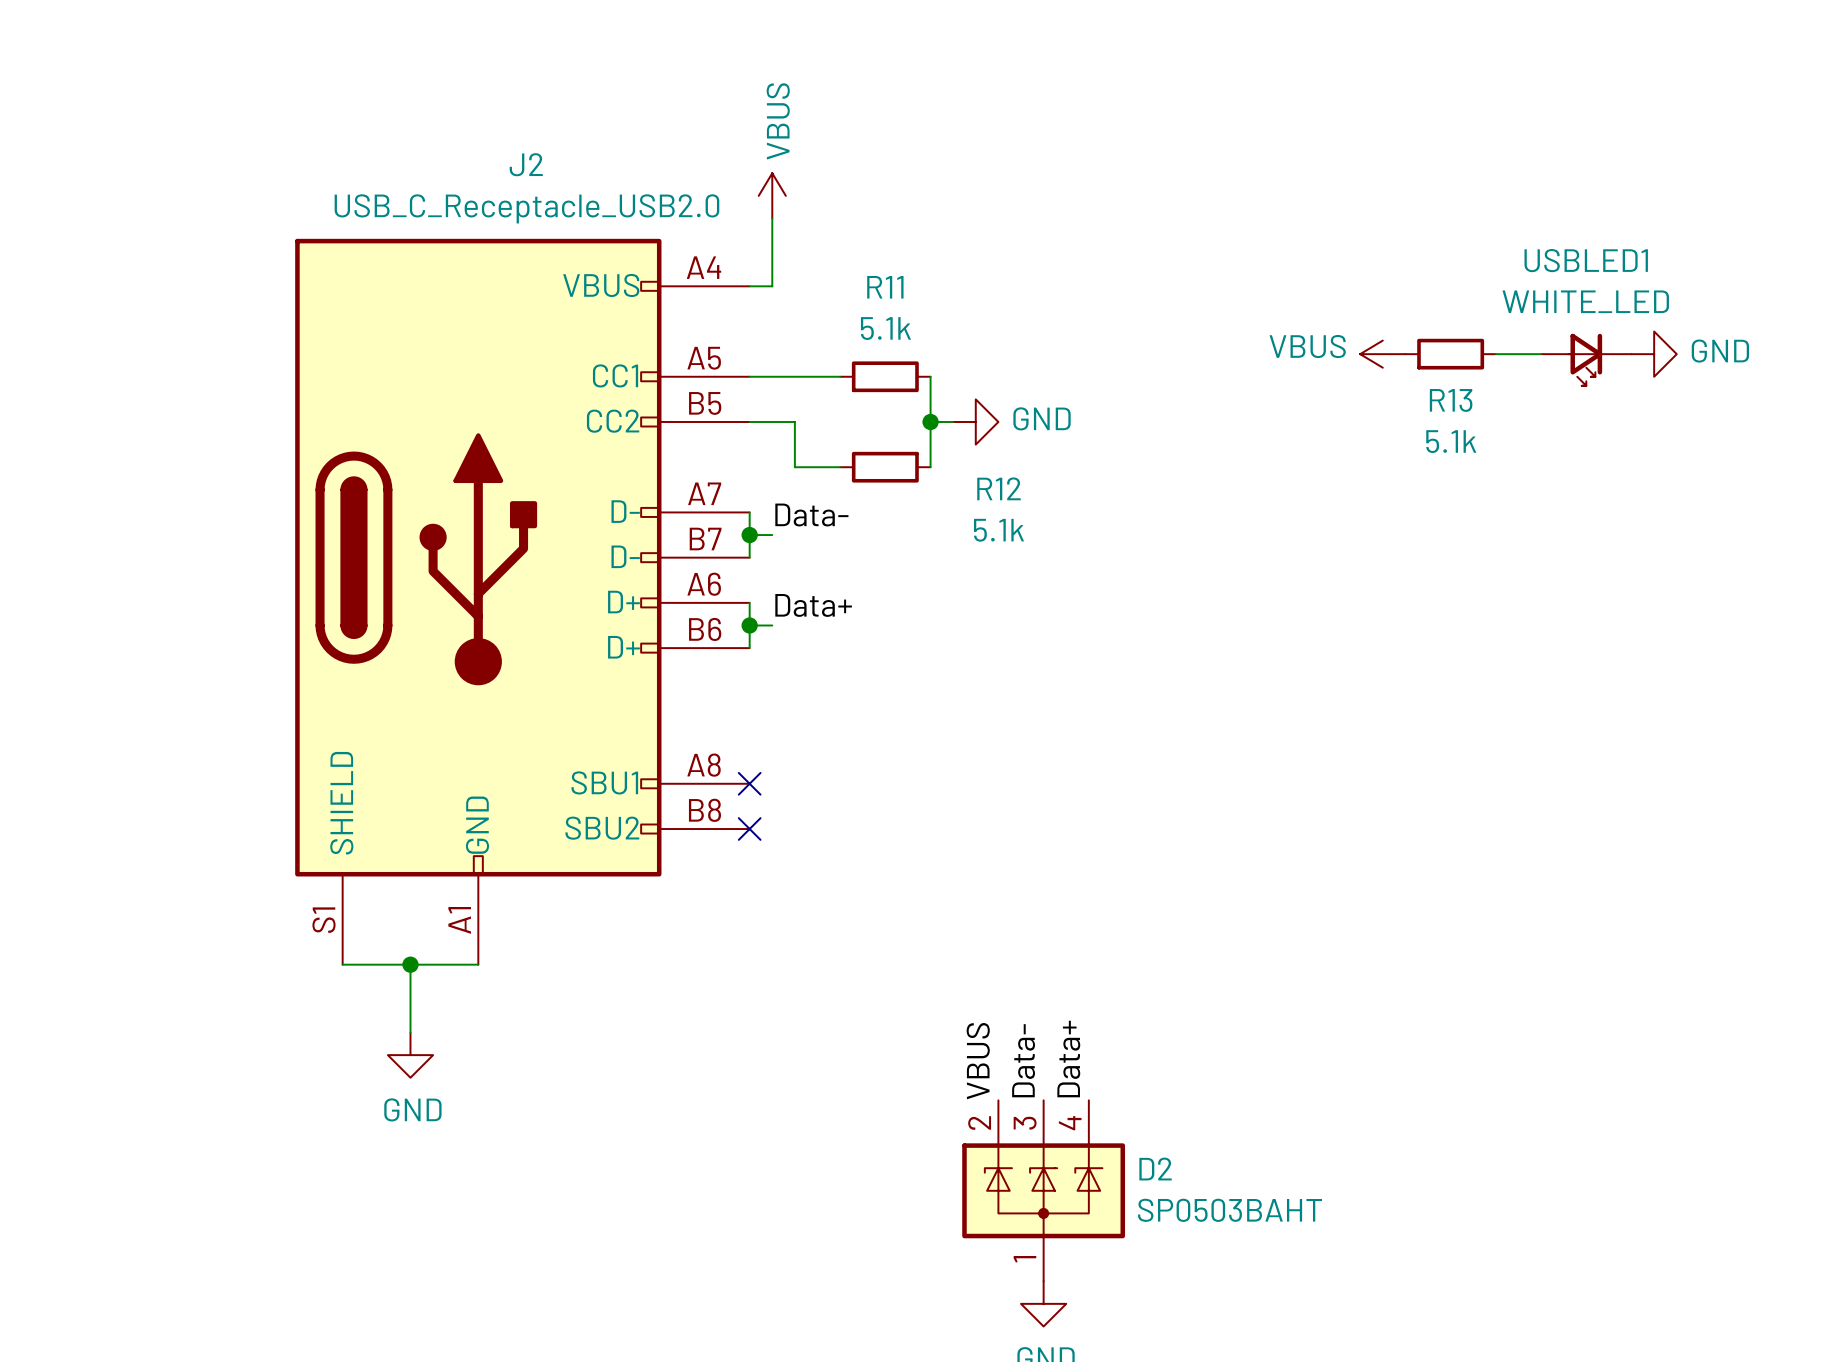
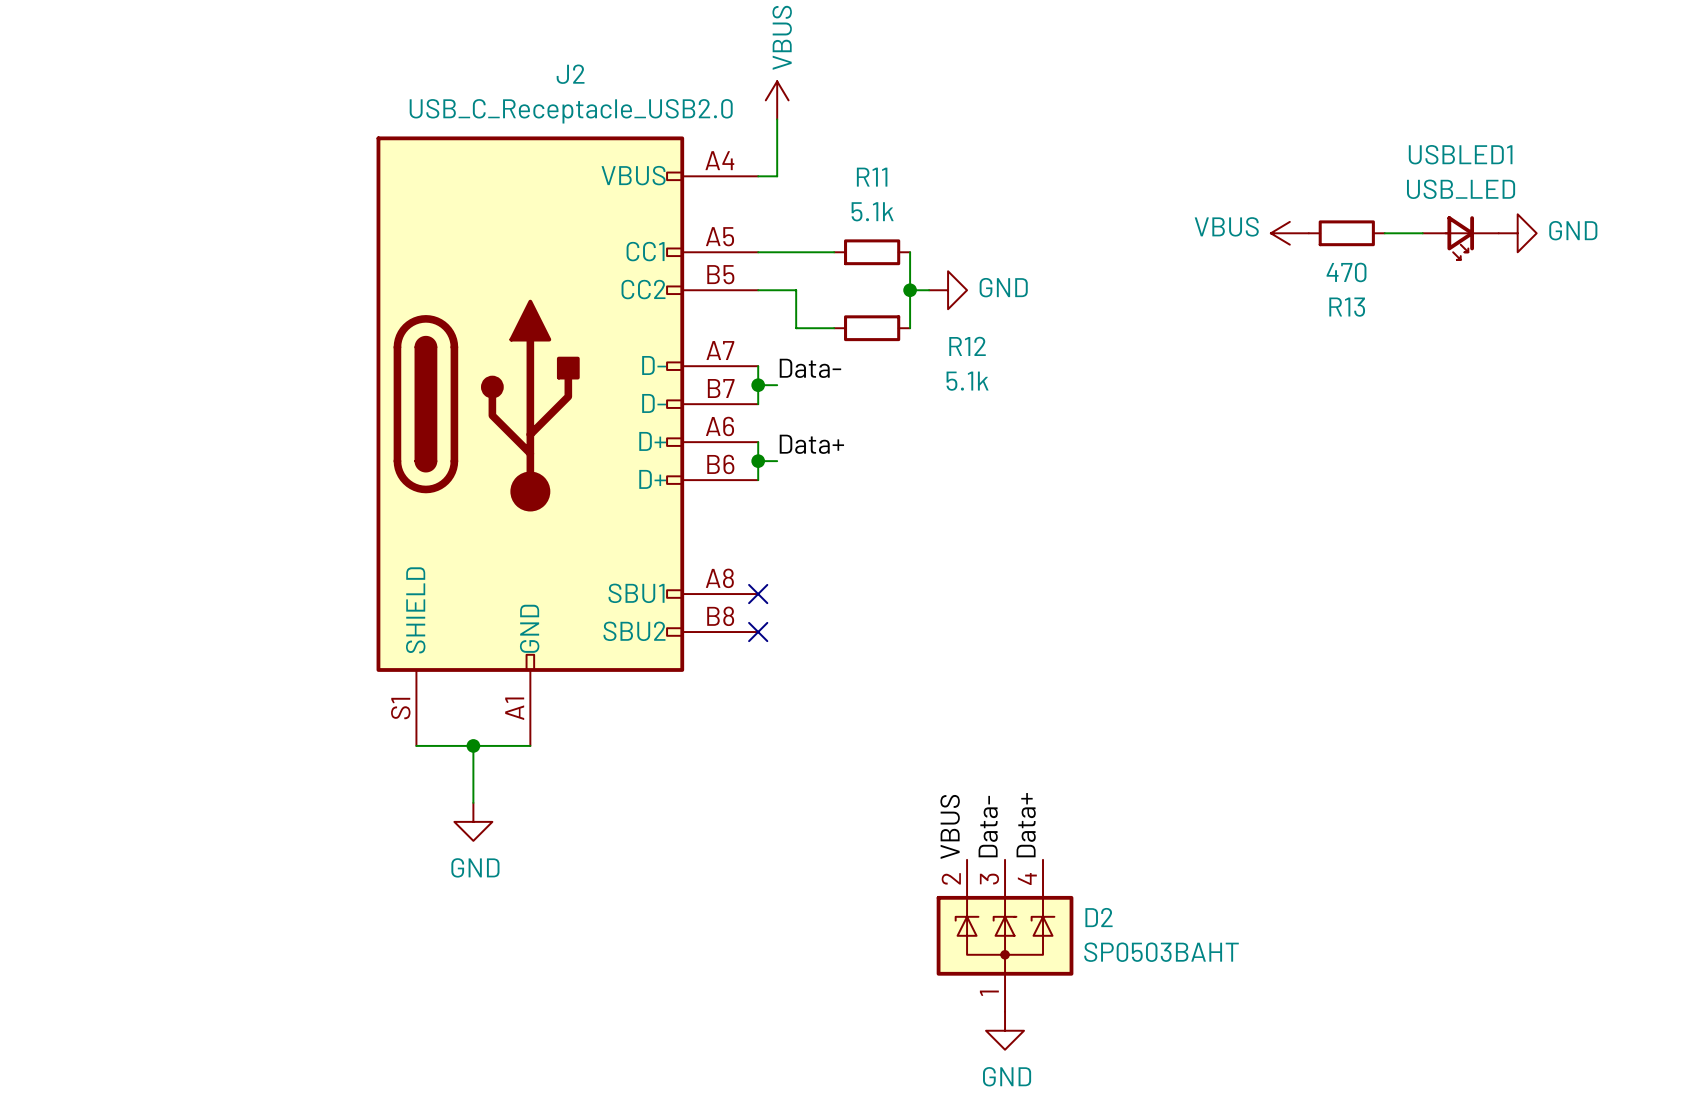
USBLED1 value: WHITE_LED (1585, 301) -> USB_LED (1461, 189)
R13 name position: R13 (1451, 400) -> R13 (1347, 307)
R13 value: 5.1k (1451, 441) -> 470 (1346, 272)

